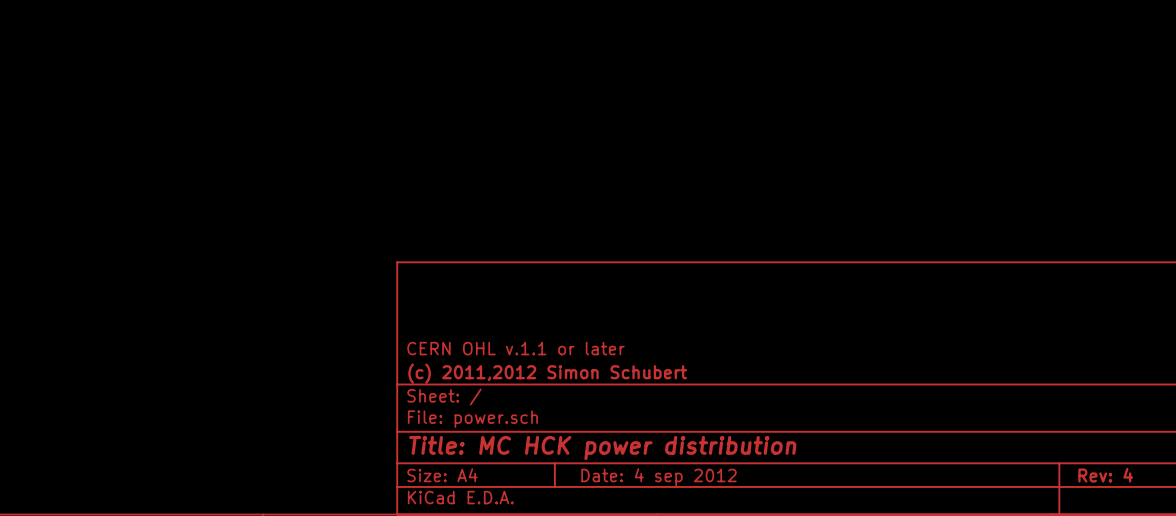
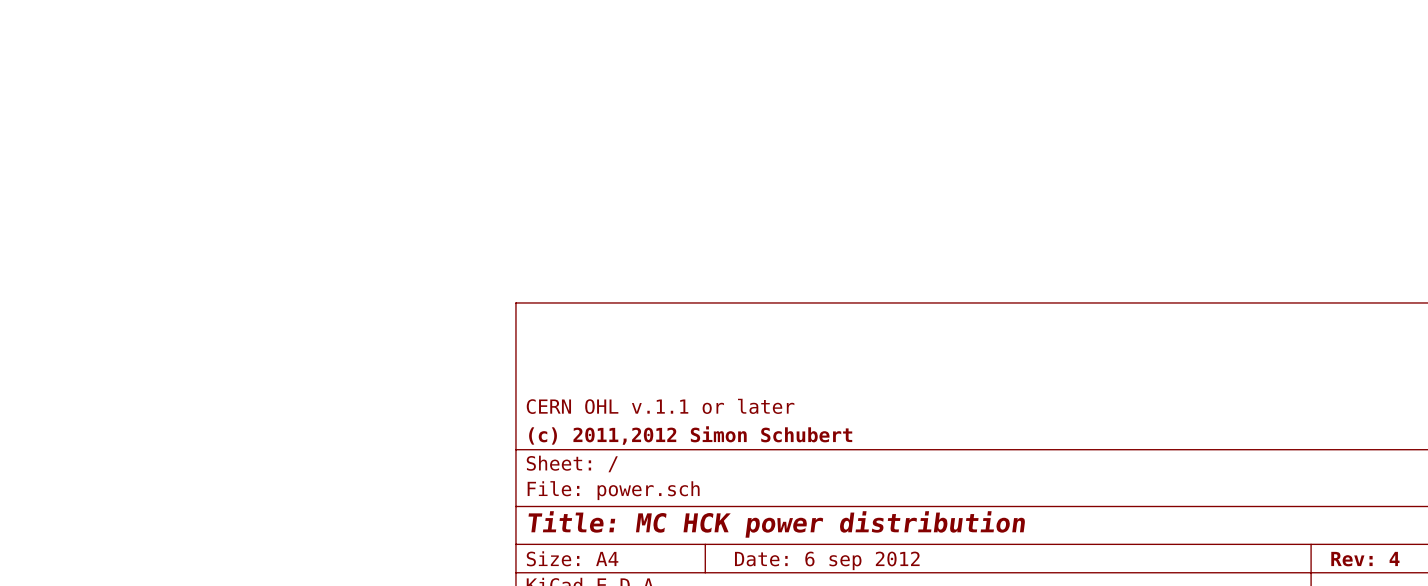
title block: Date: 4 sep 2012 (658, 477) -> Date: 6 sep 2012 (827, 560)

